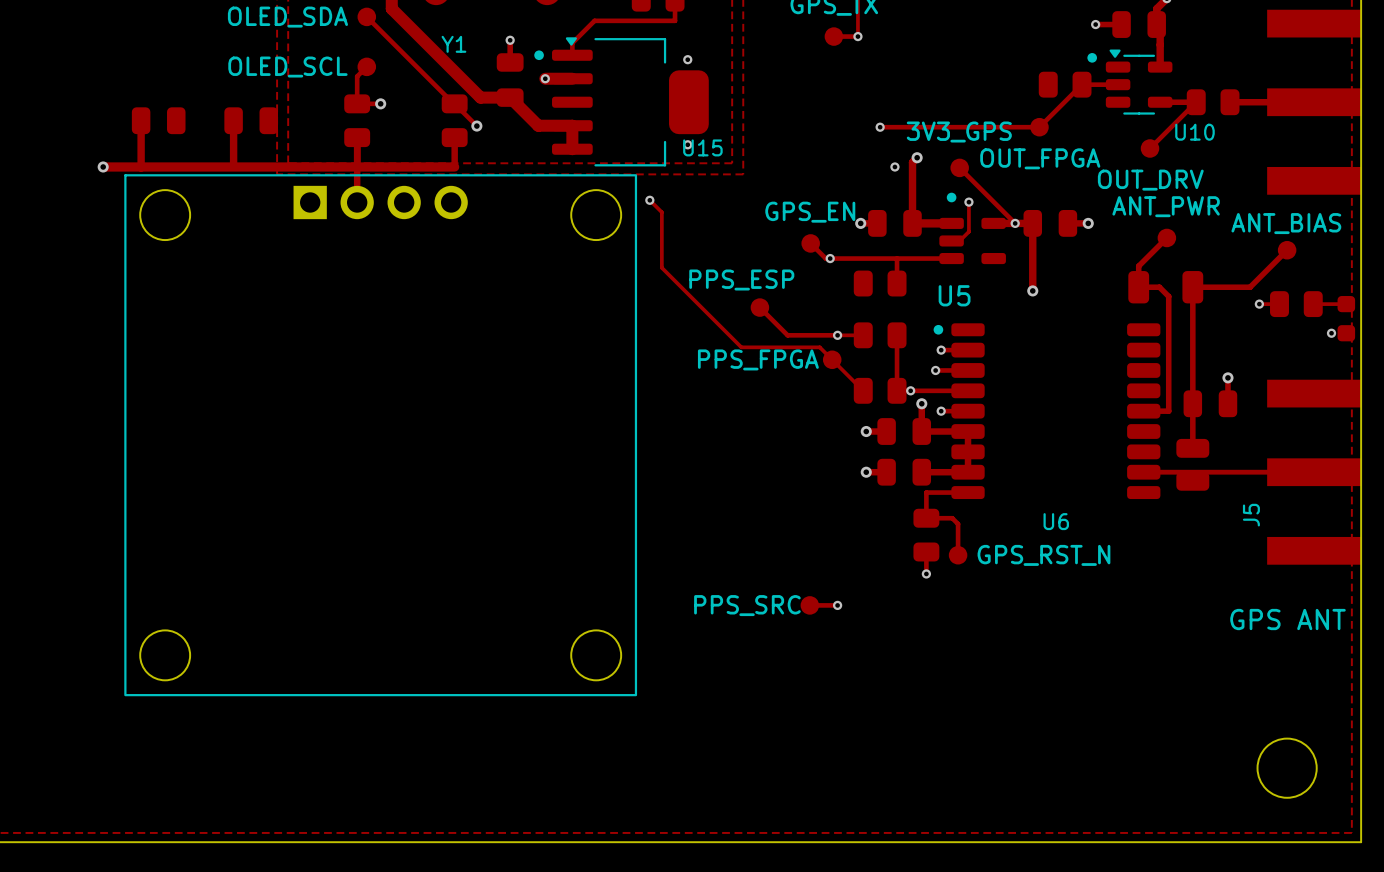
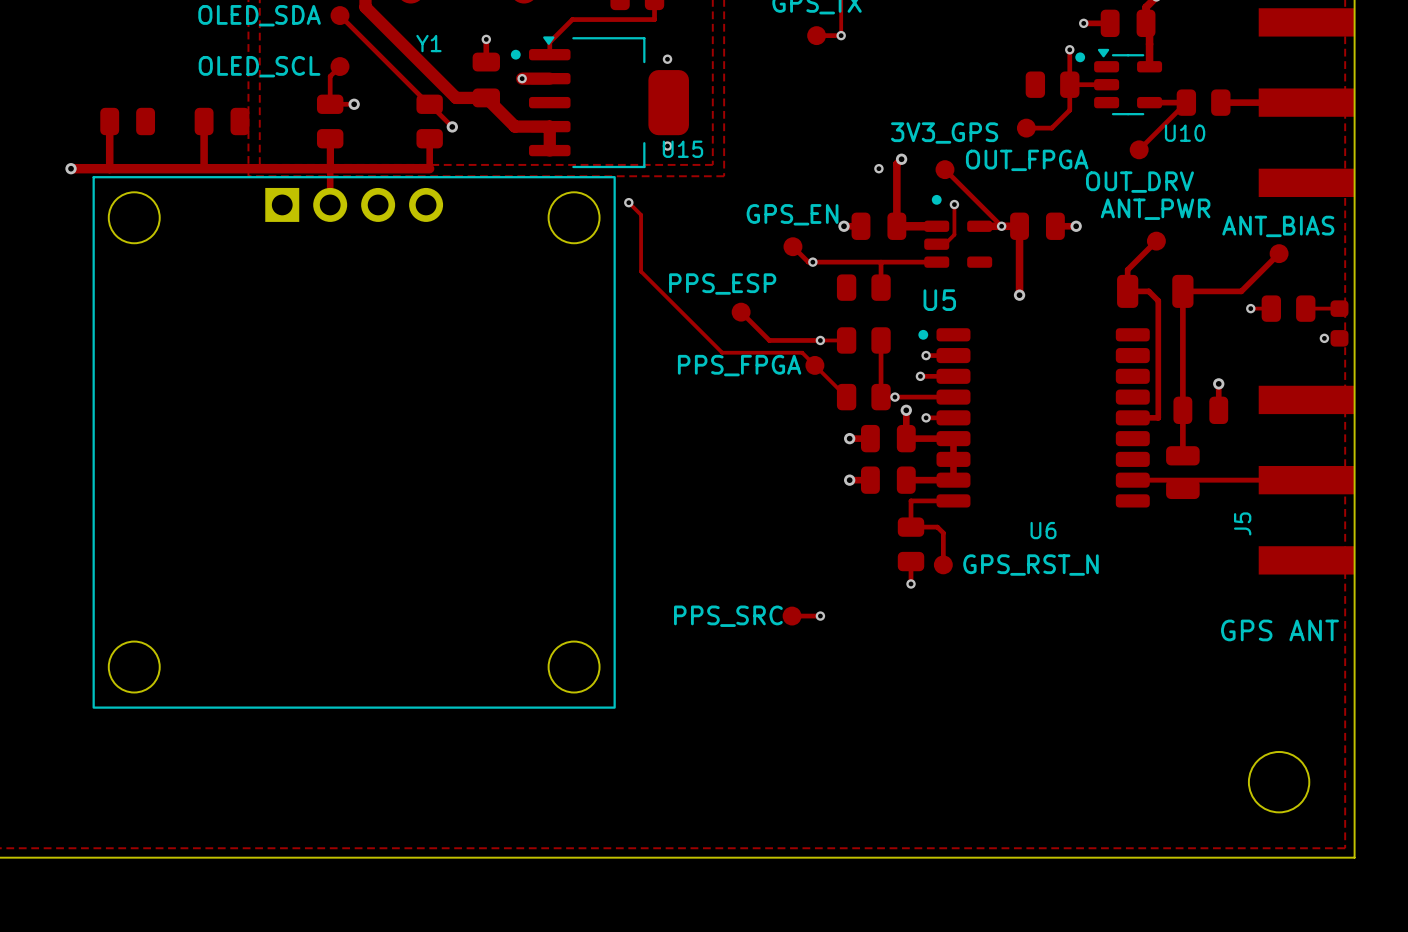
track: none -> (1069, 49) (1069, 110) (1051, 128) (1026, 128)
via: none -> (1069, 49)
track: (1082, 84) (1039, 127) (880, 127) -> none
via: (880, 127) -> none

